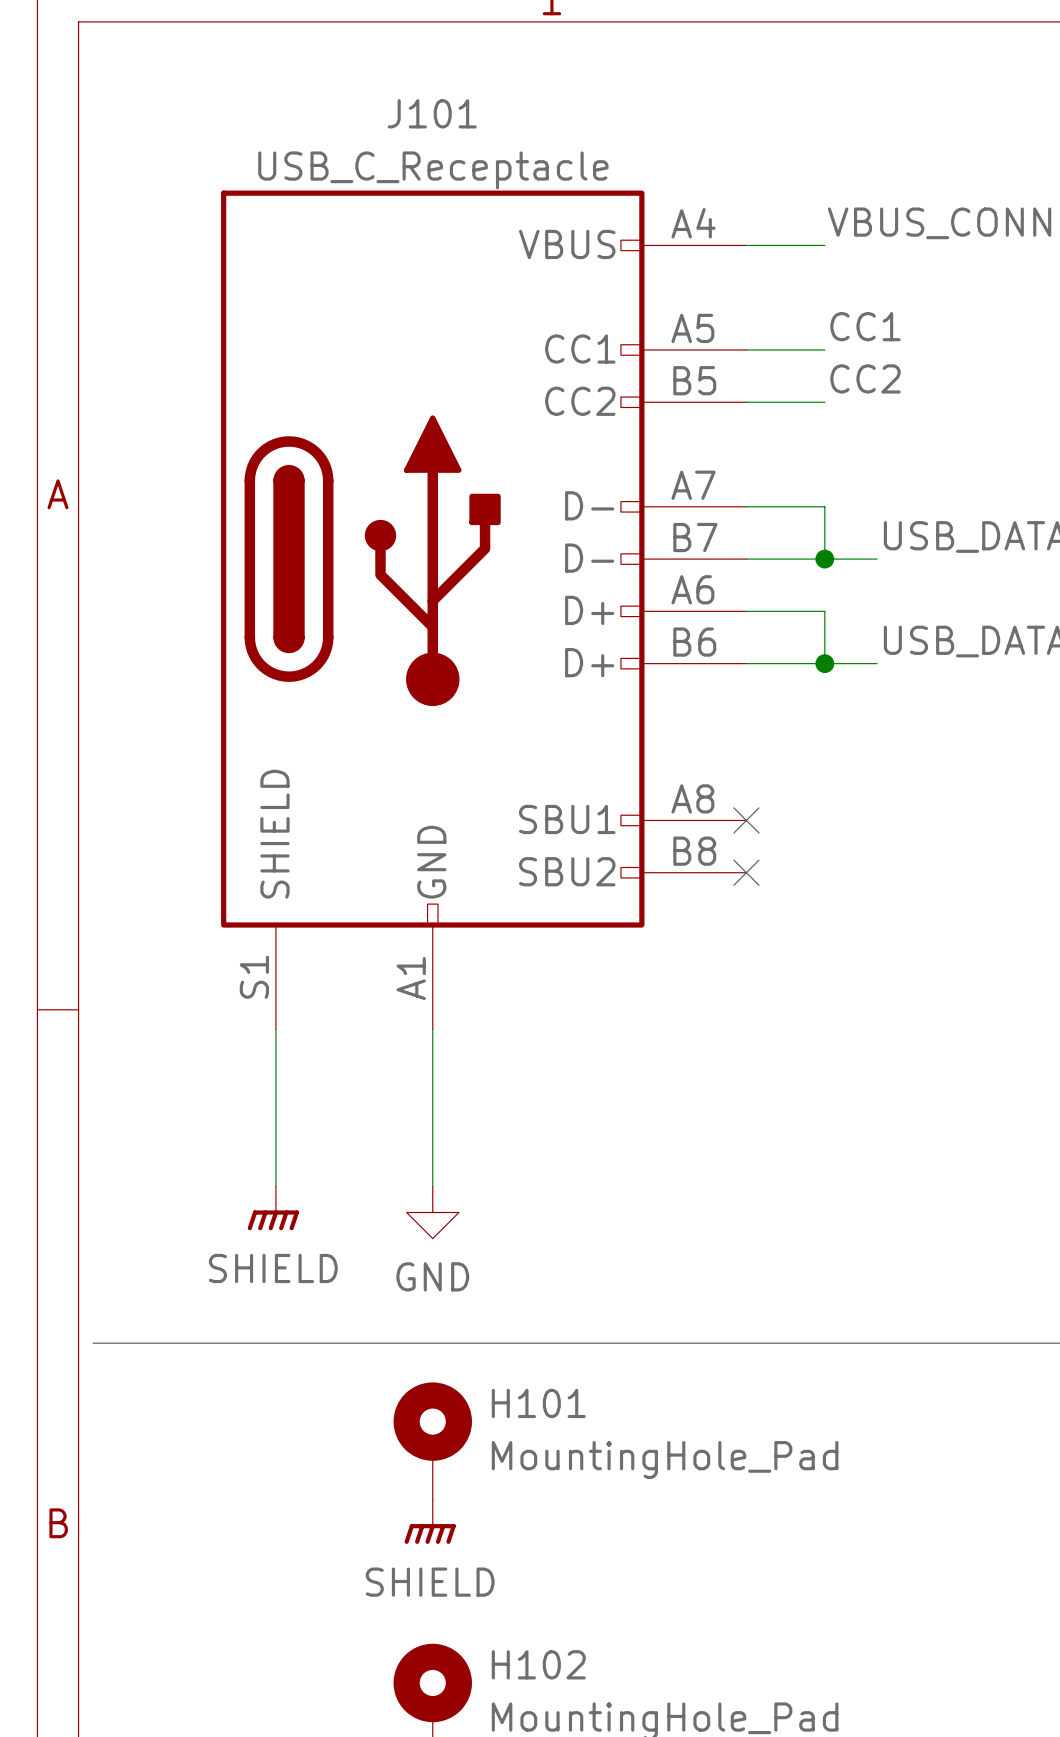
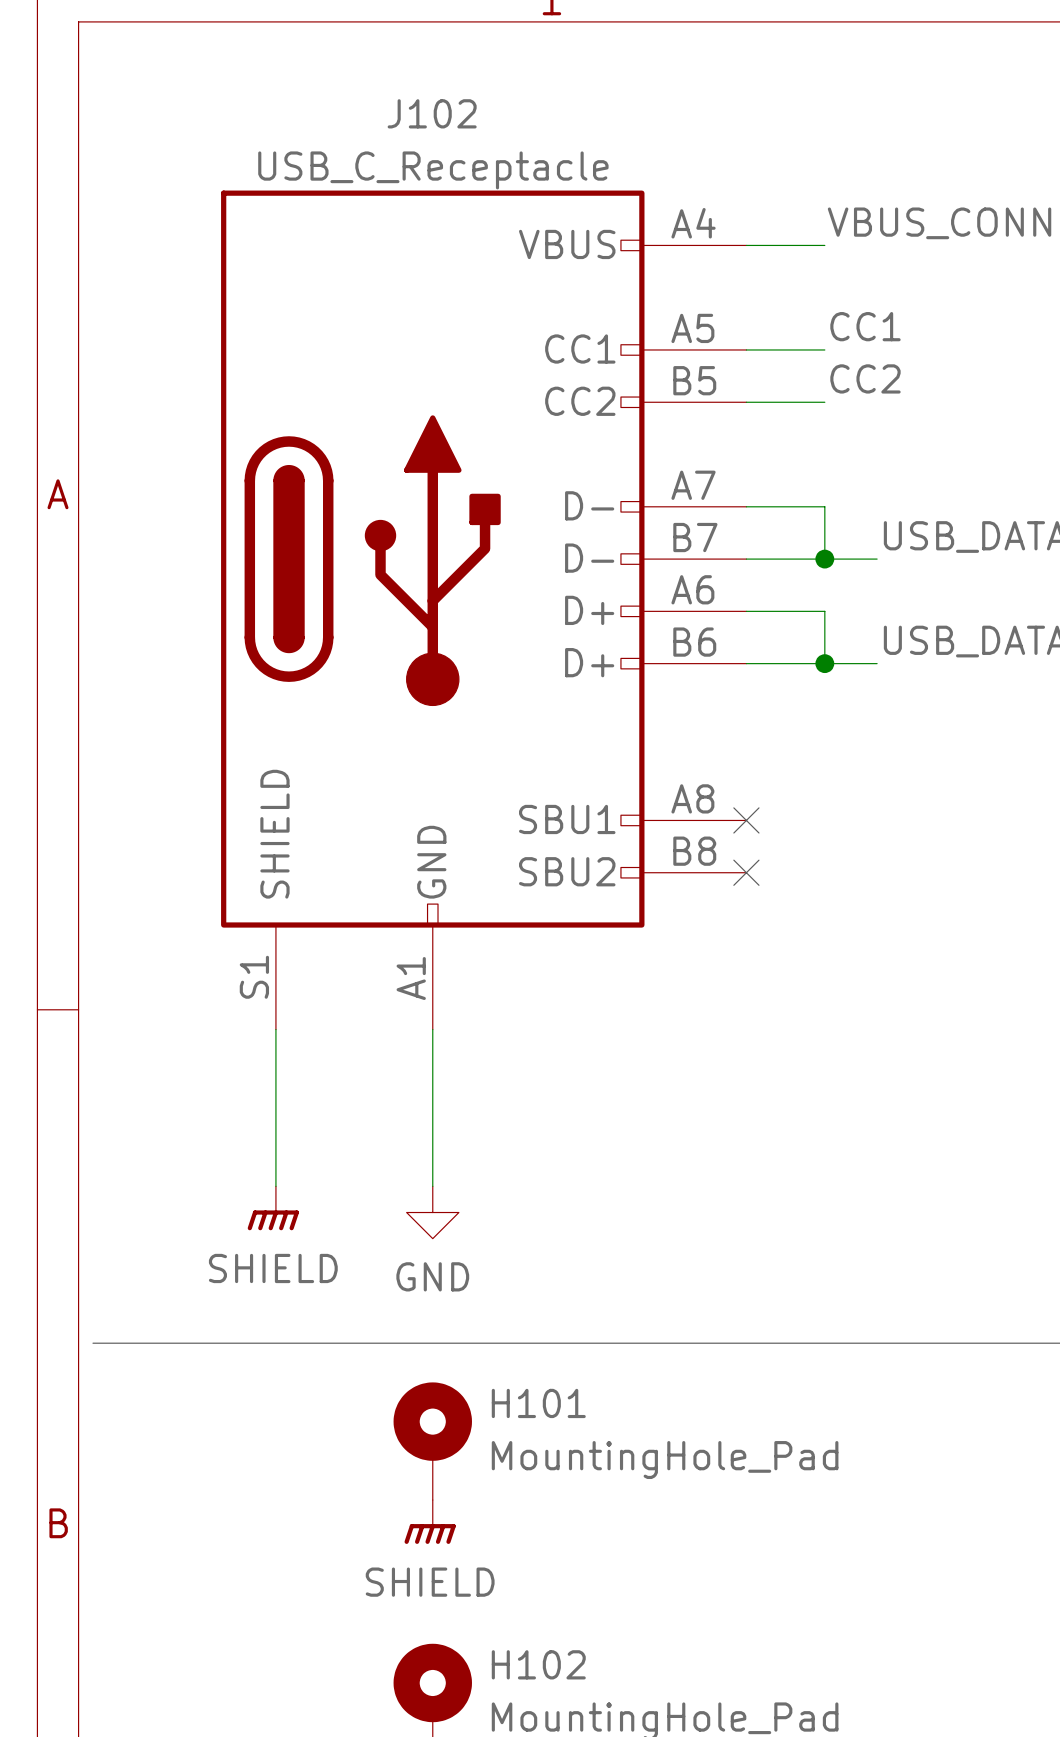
J101 name: J101 (432, 113) -> J102 (432, 113)

